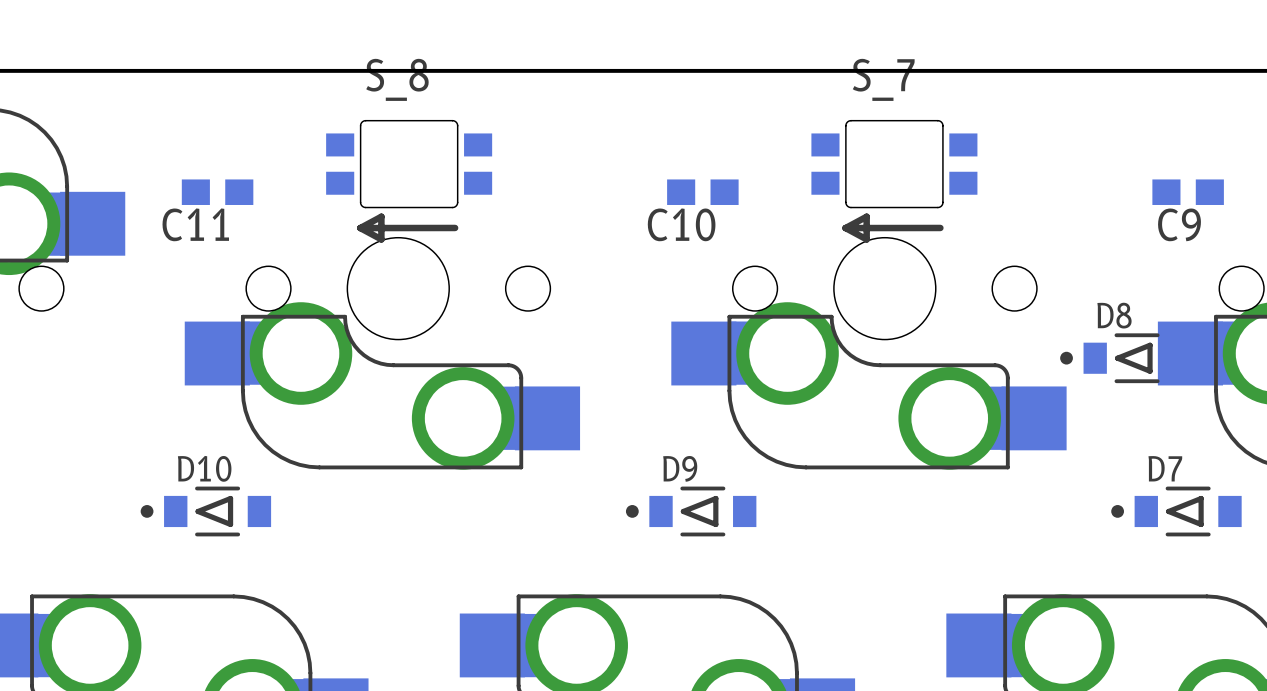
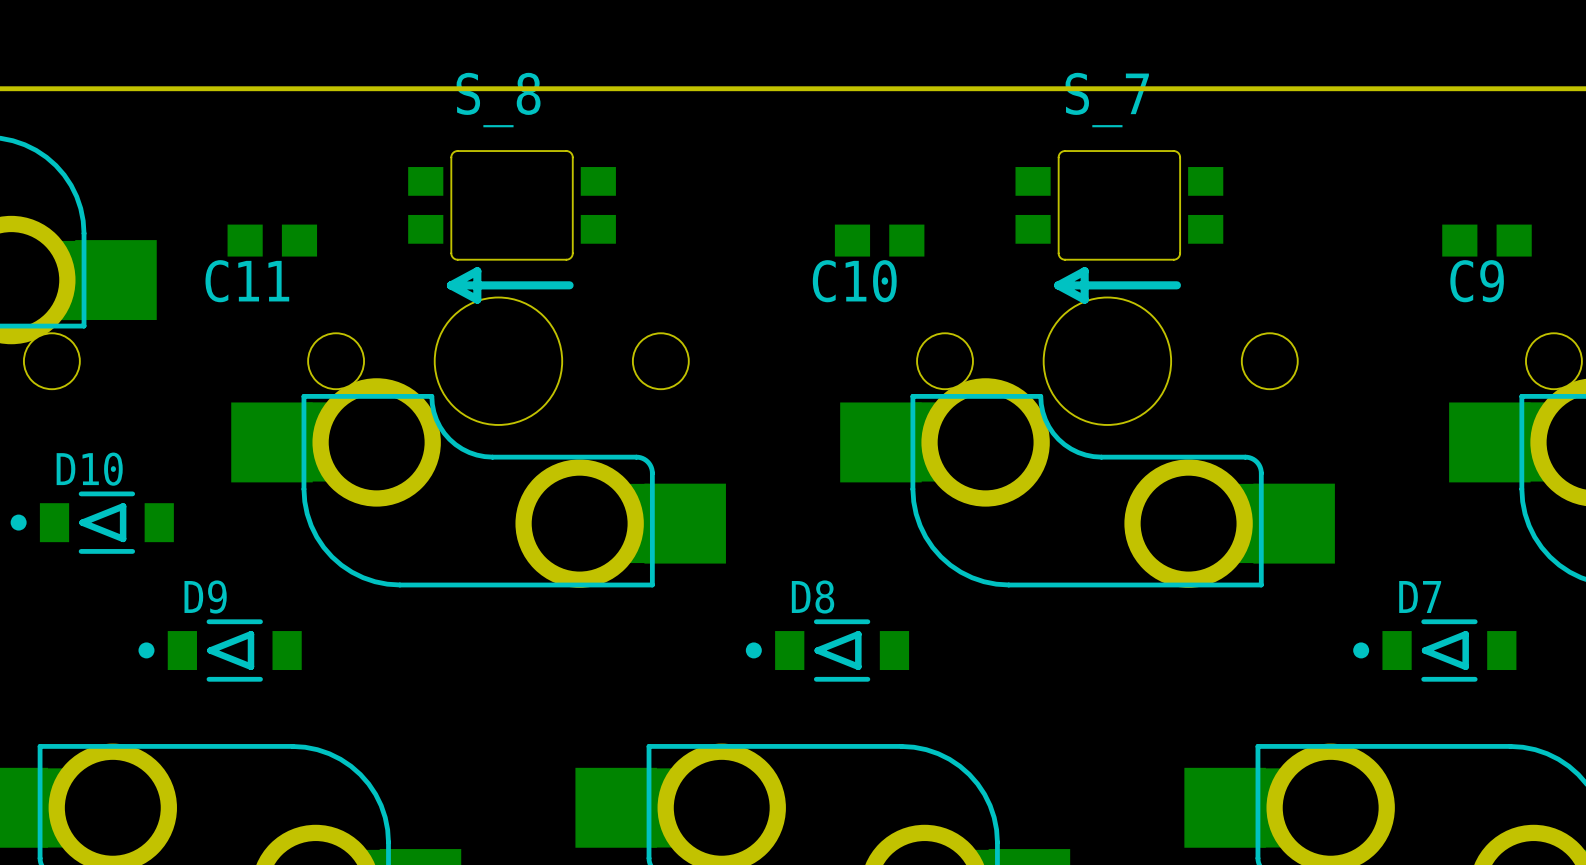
D8 position: (1125, 358) -> (827, 650)
D10 position: (205, 511) -> (92, 522)
D9 position: (691, 511) -> (220, 650)
D7 position: (1176, 511) -> (1434, 650)

